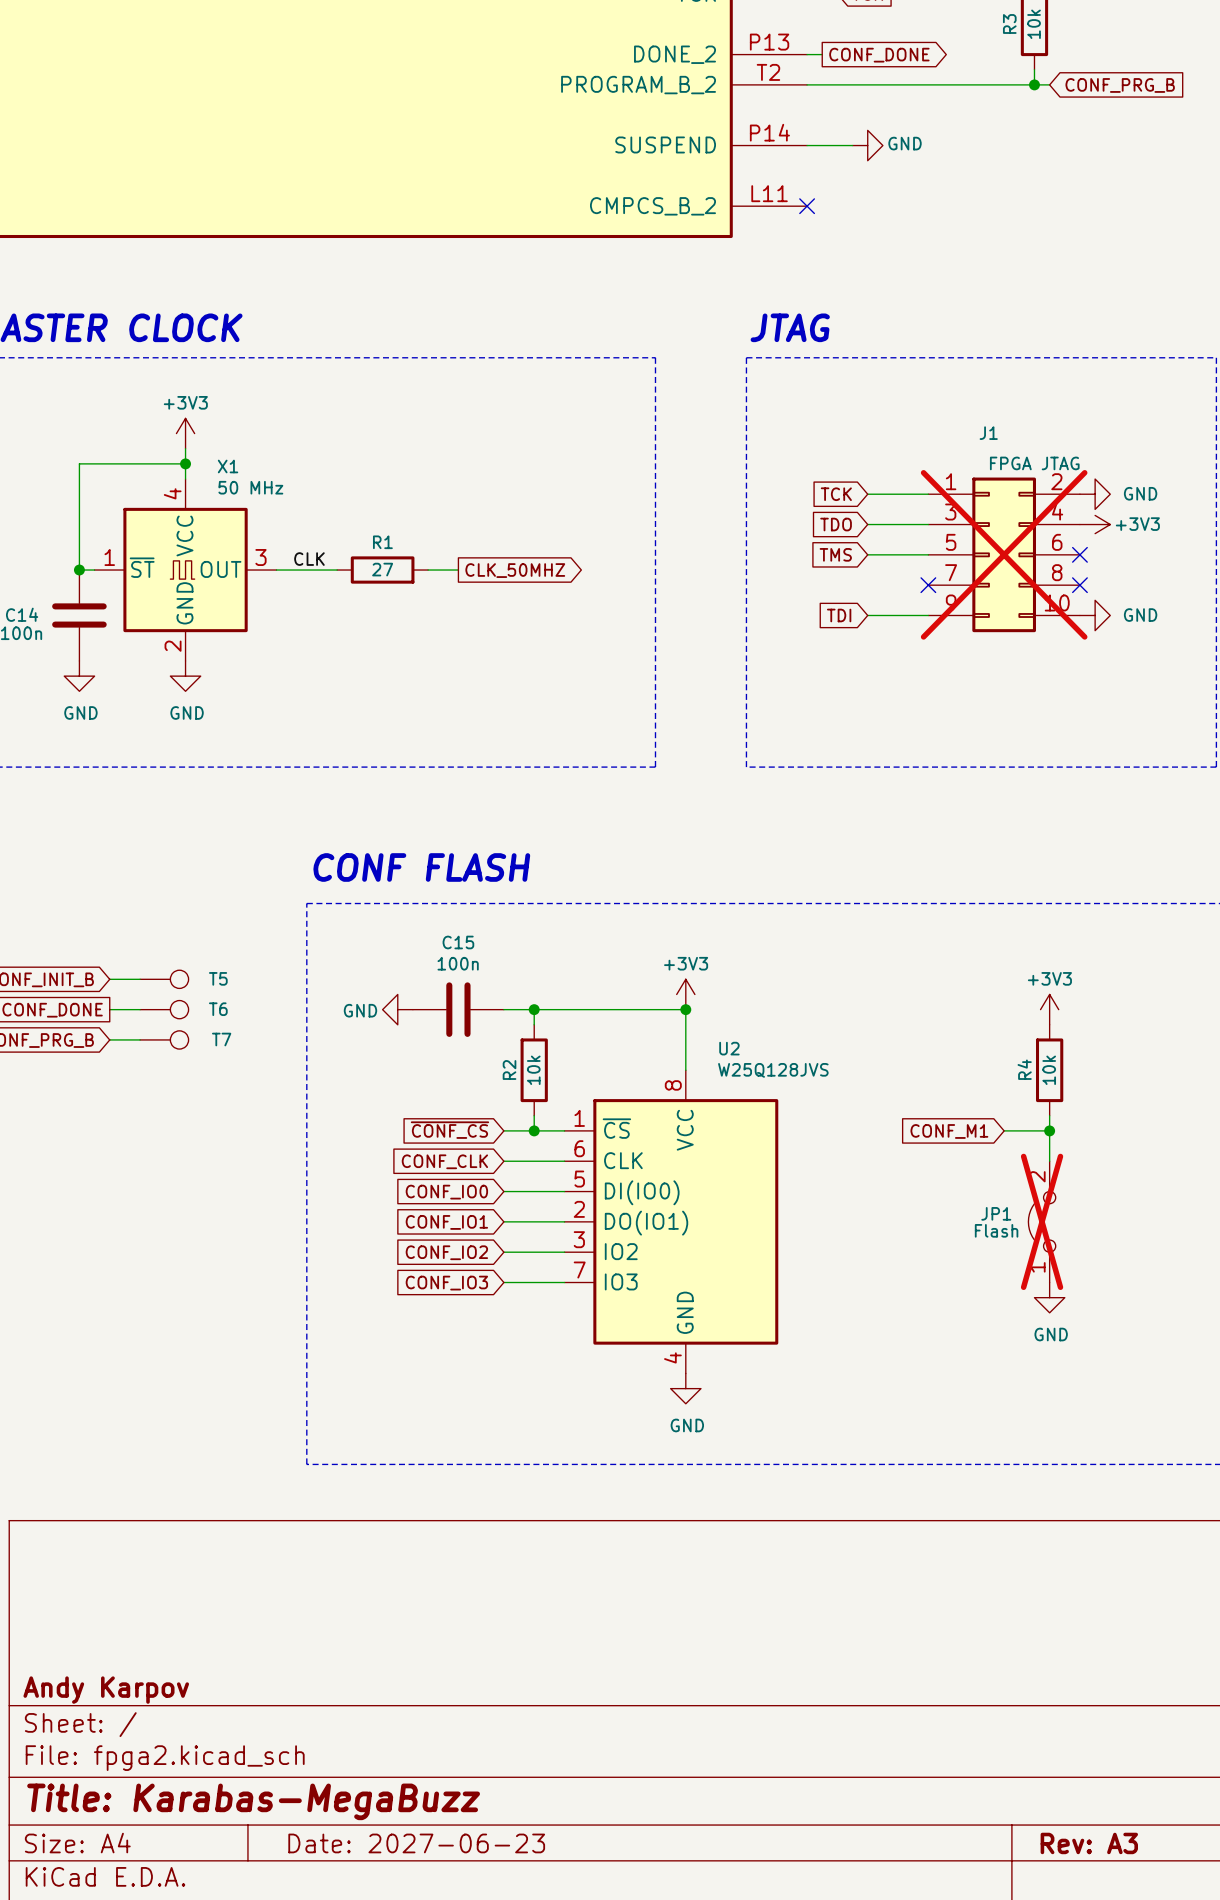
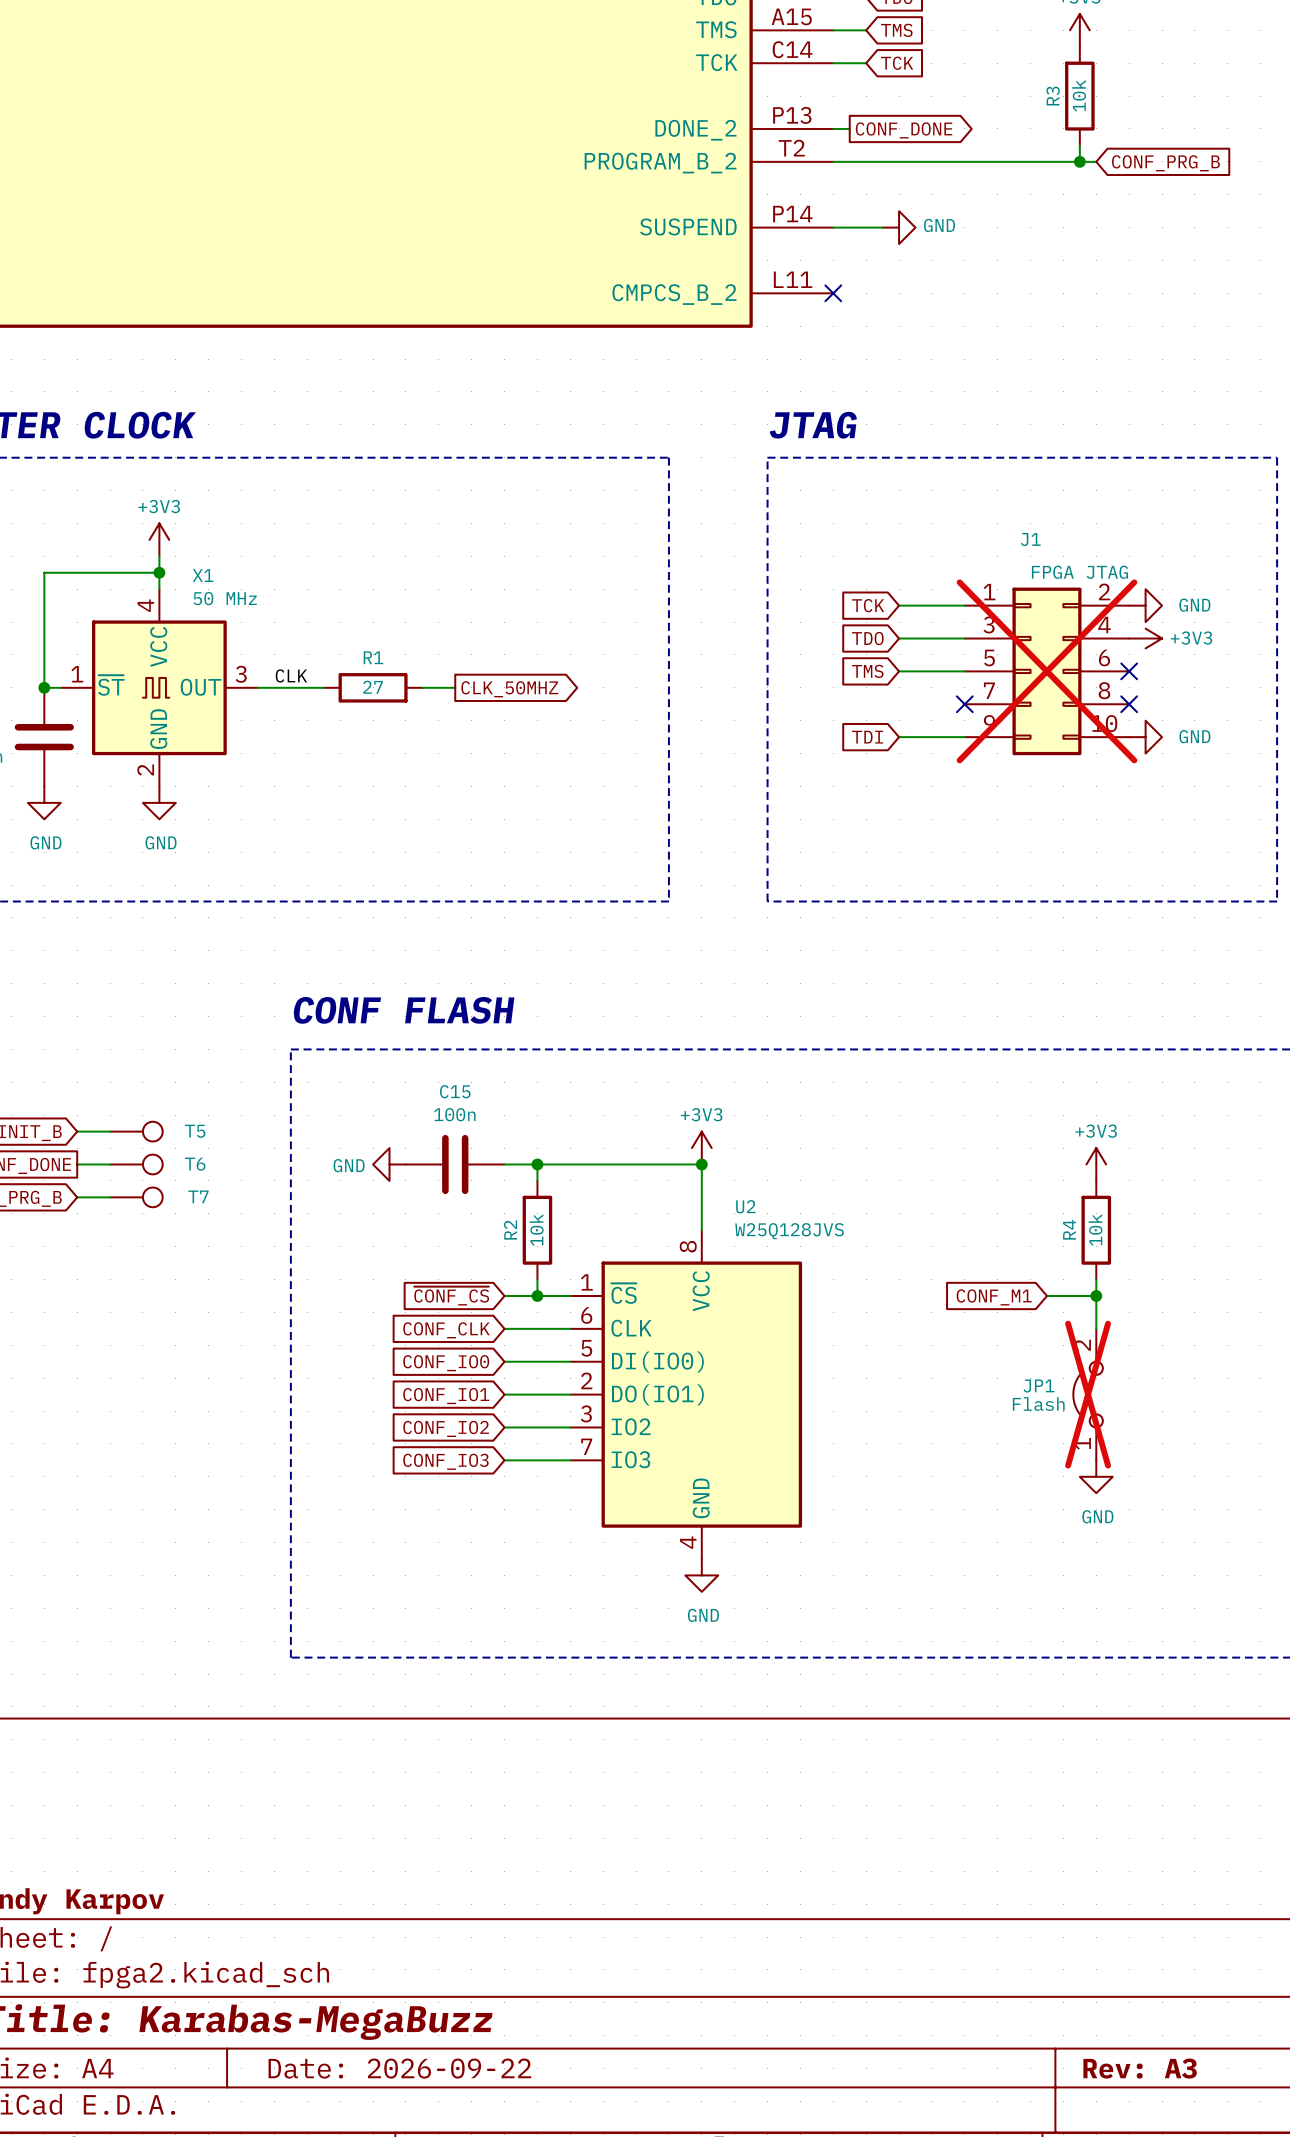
title block: Date: 2027-06-23 (416, 1843) -> Date: 2026-09-22 (399, 2068)

